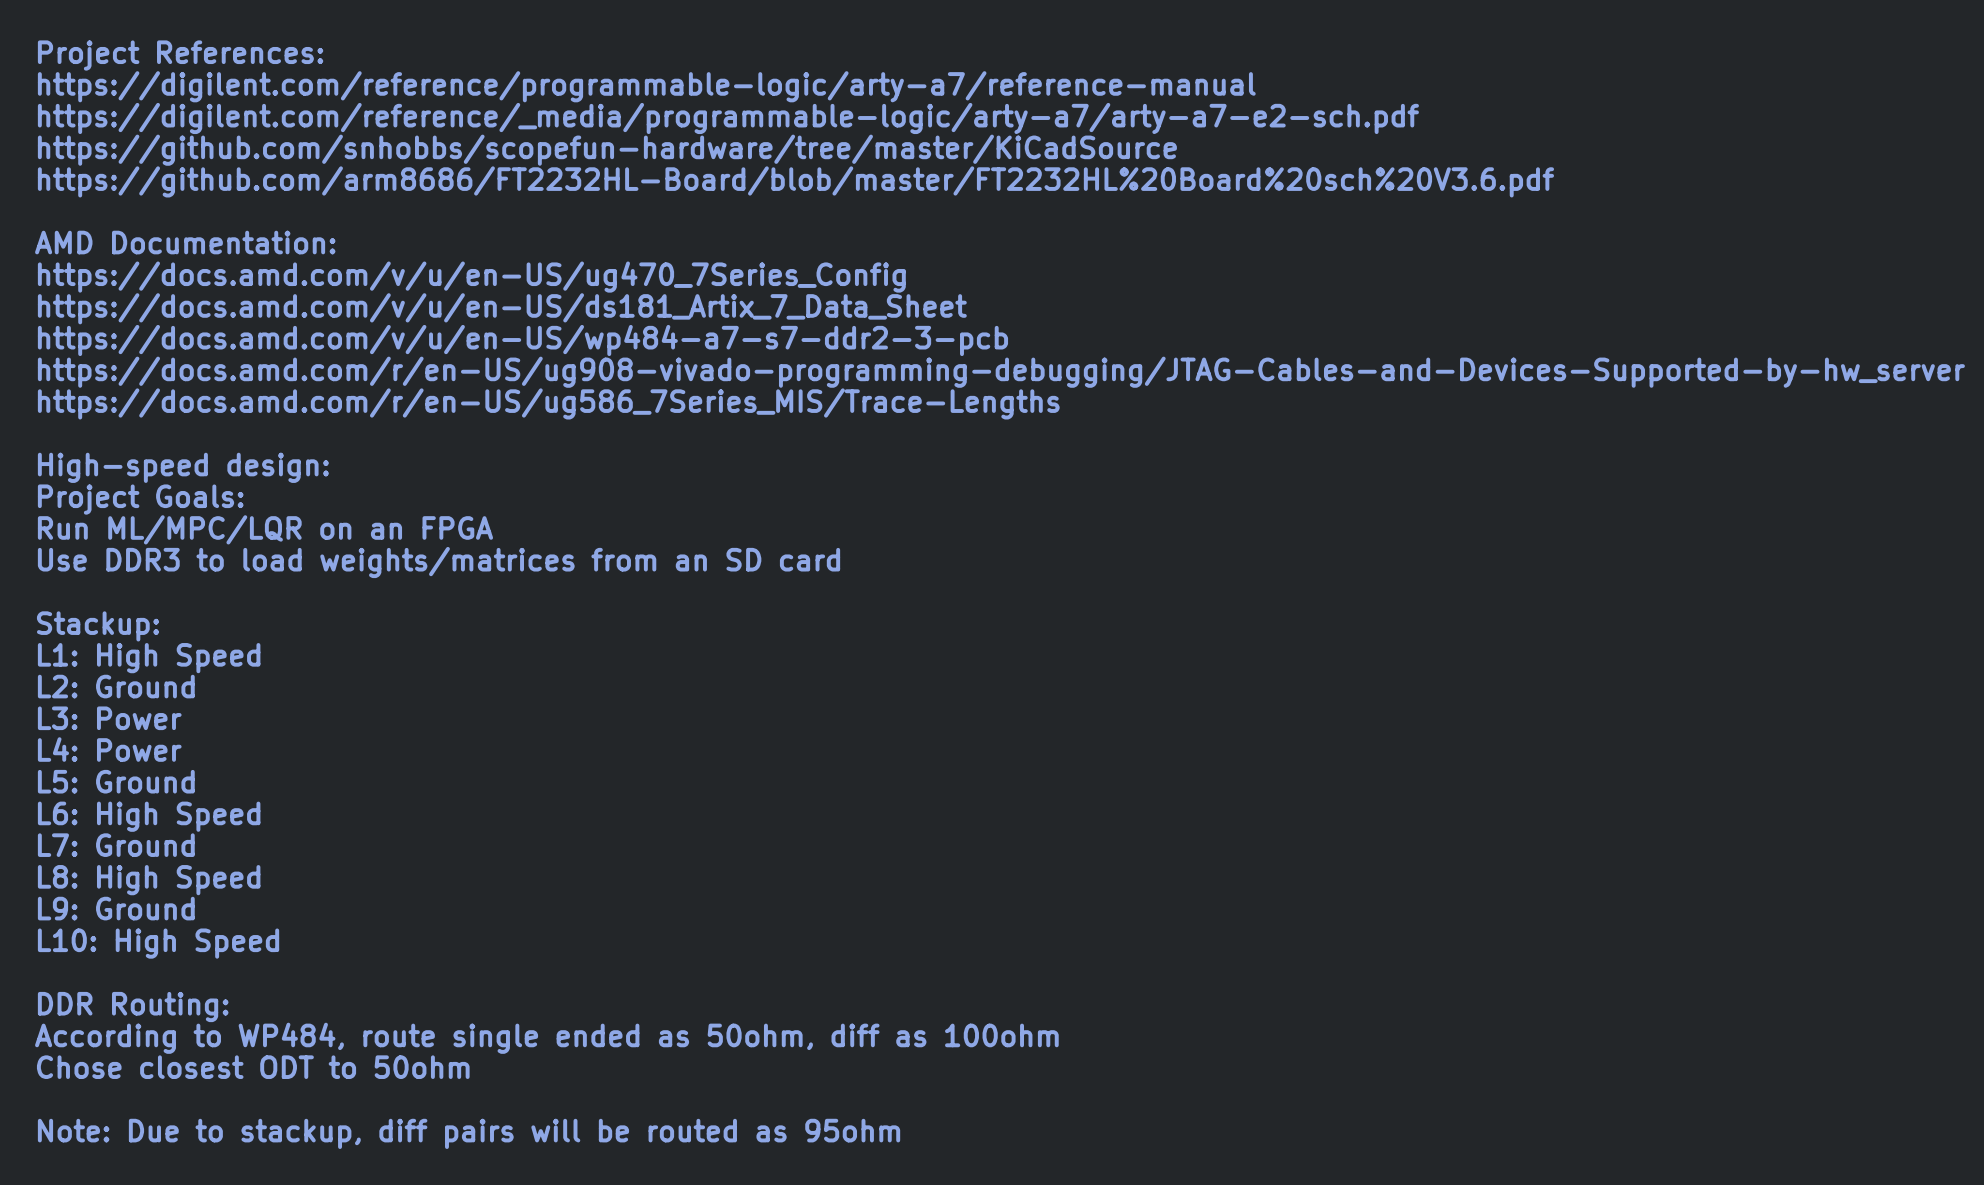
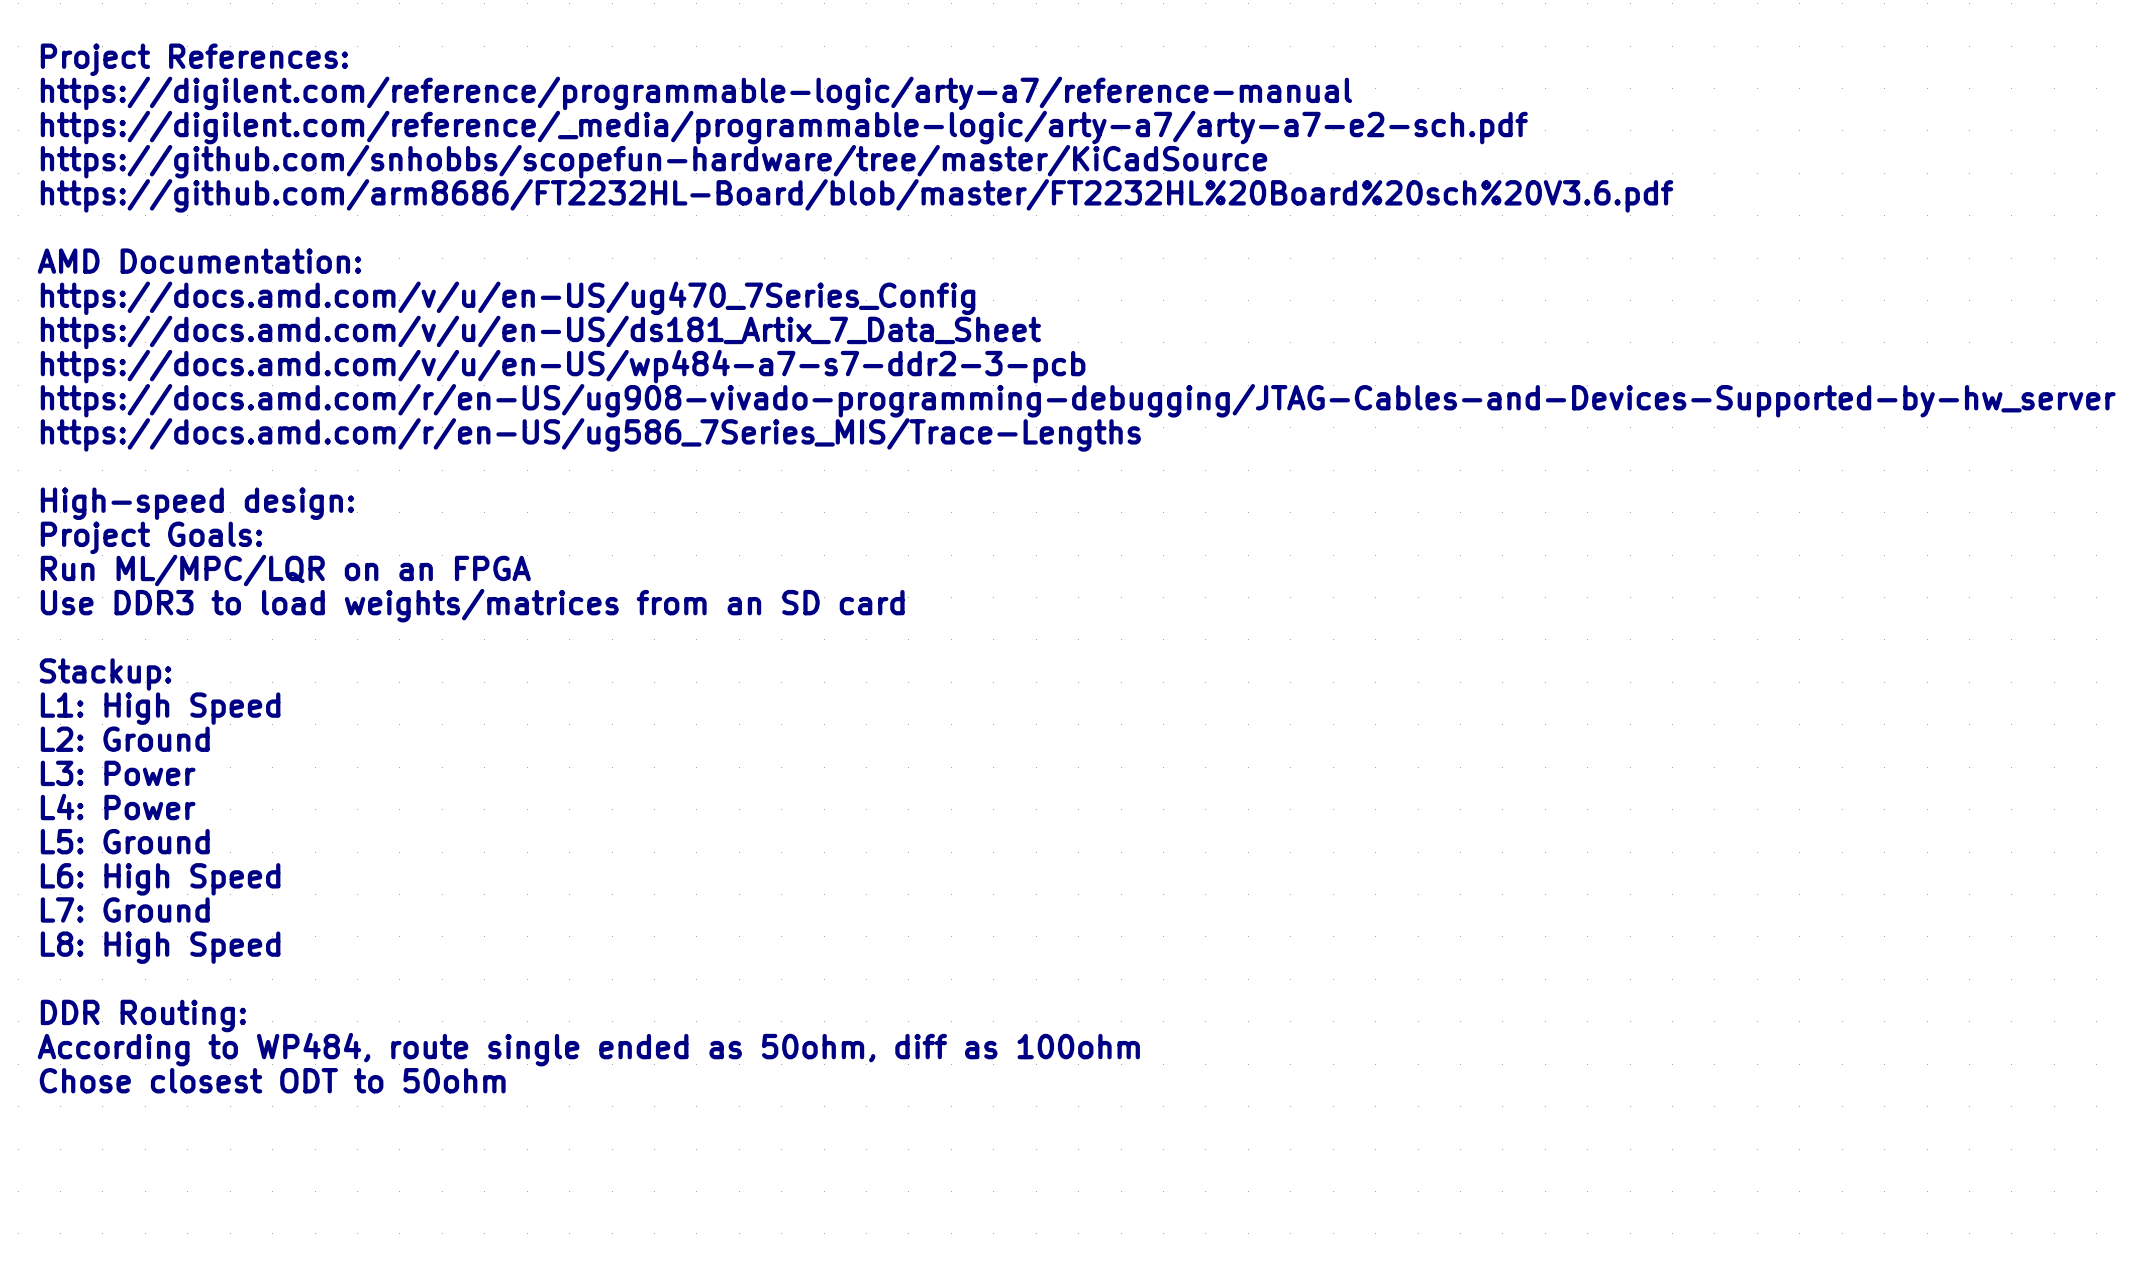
text: L9: Ground (116, 908) -> none
text: L10: High Speed (158, 943) -> DDR Routing: (143, 1015)
text: DDR Routing: (133, 1007) -> Chose closest ODT to 50ohm (272, 1080)
text position: According to WP484, route single ended as 50ohm, diff as 100ohm (546, 1038) -> According to WP484, route single ended as 50ohm, diff as 100ohm (588, 1049)
text: Chose closest ODT to 50ohm (253, 1067) -> none
text: Note: Due to stackup, diff pairs will be routed as 95ohm (469, 1133) -> none

